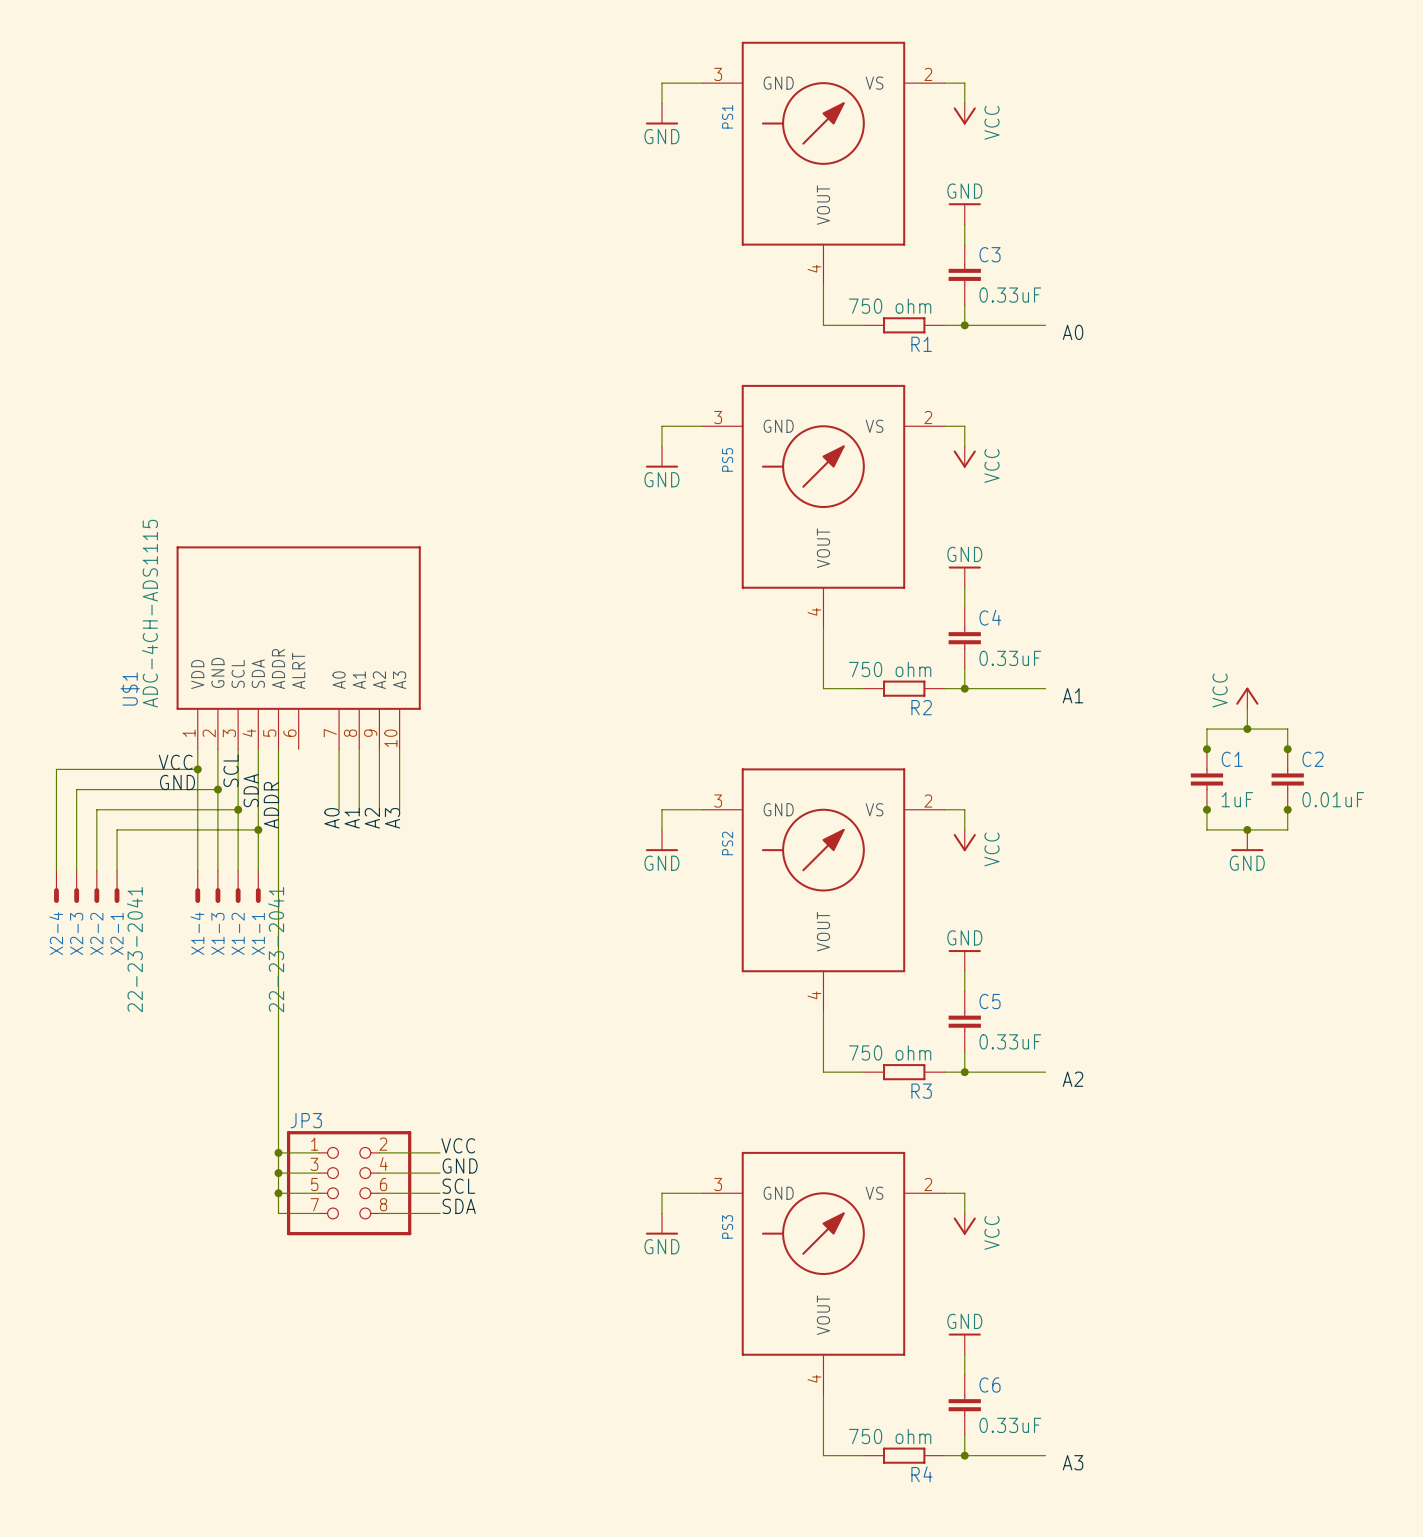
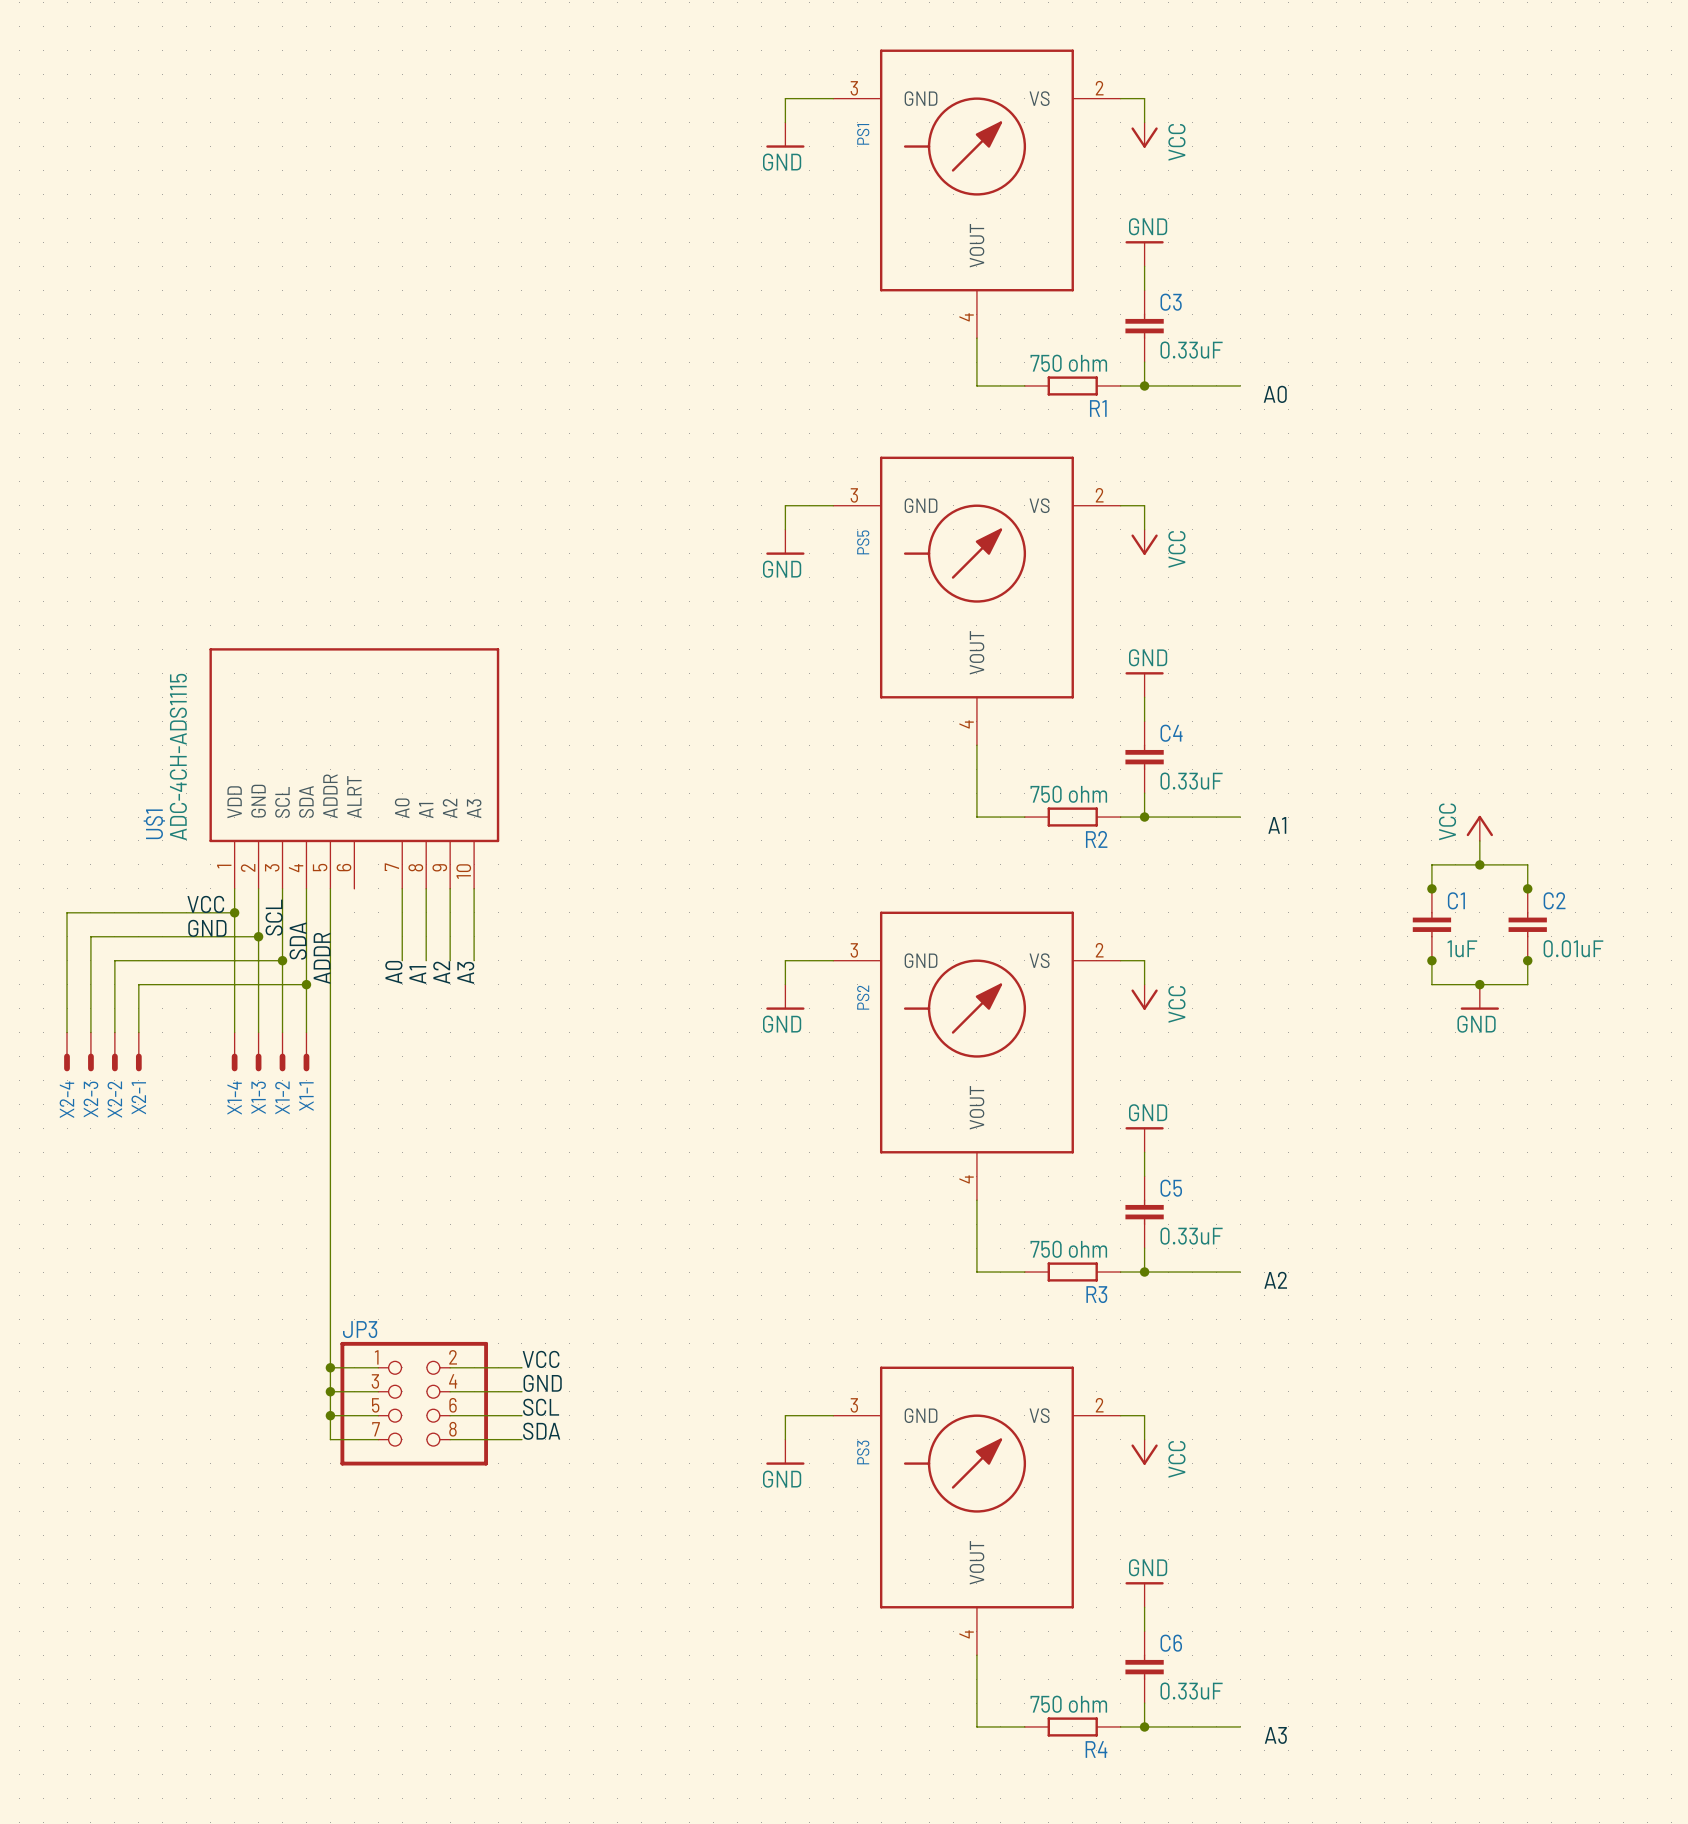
X2-1 value: 22-23-2041 (134, 949) -> none
X1-1 value: 22-23-2041 (276, 949) -> none

